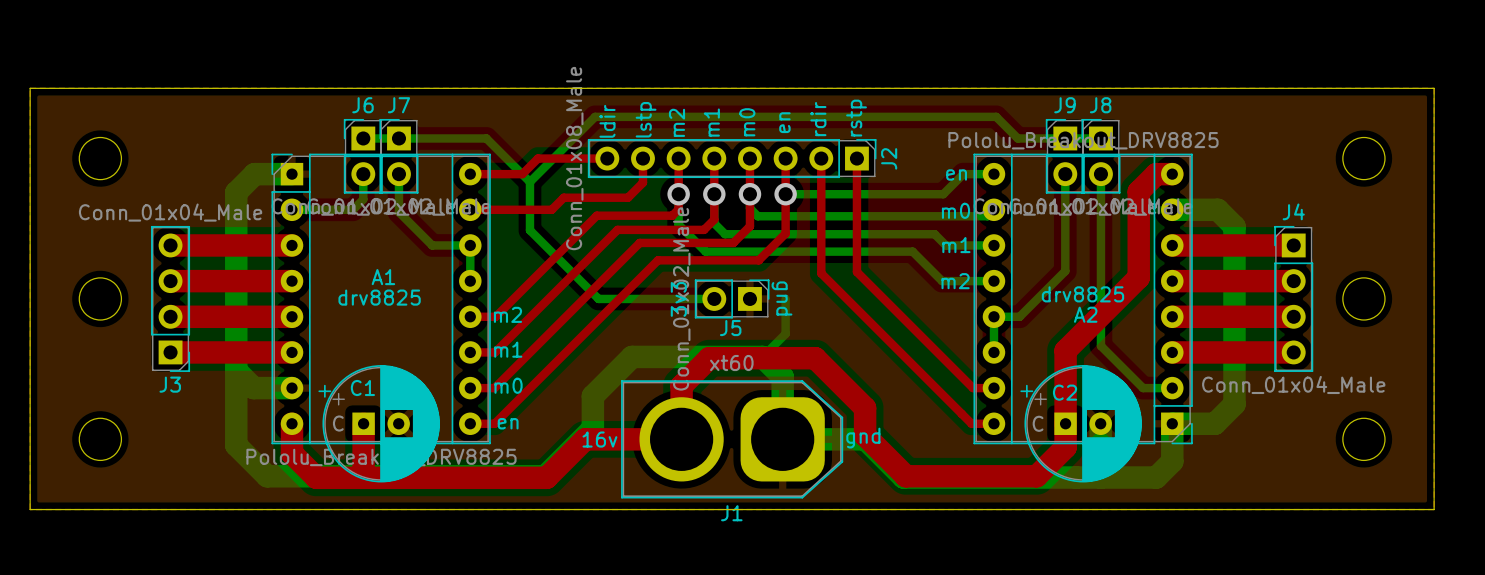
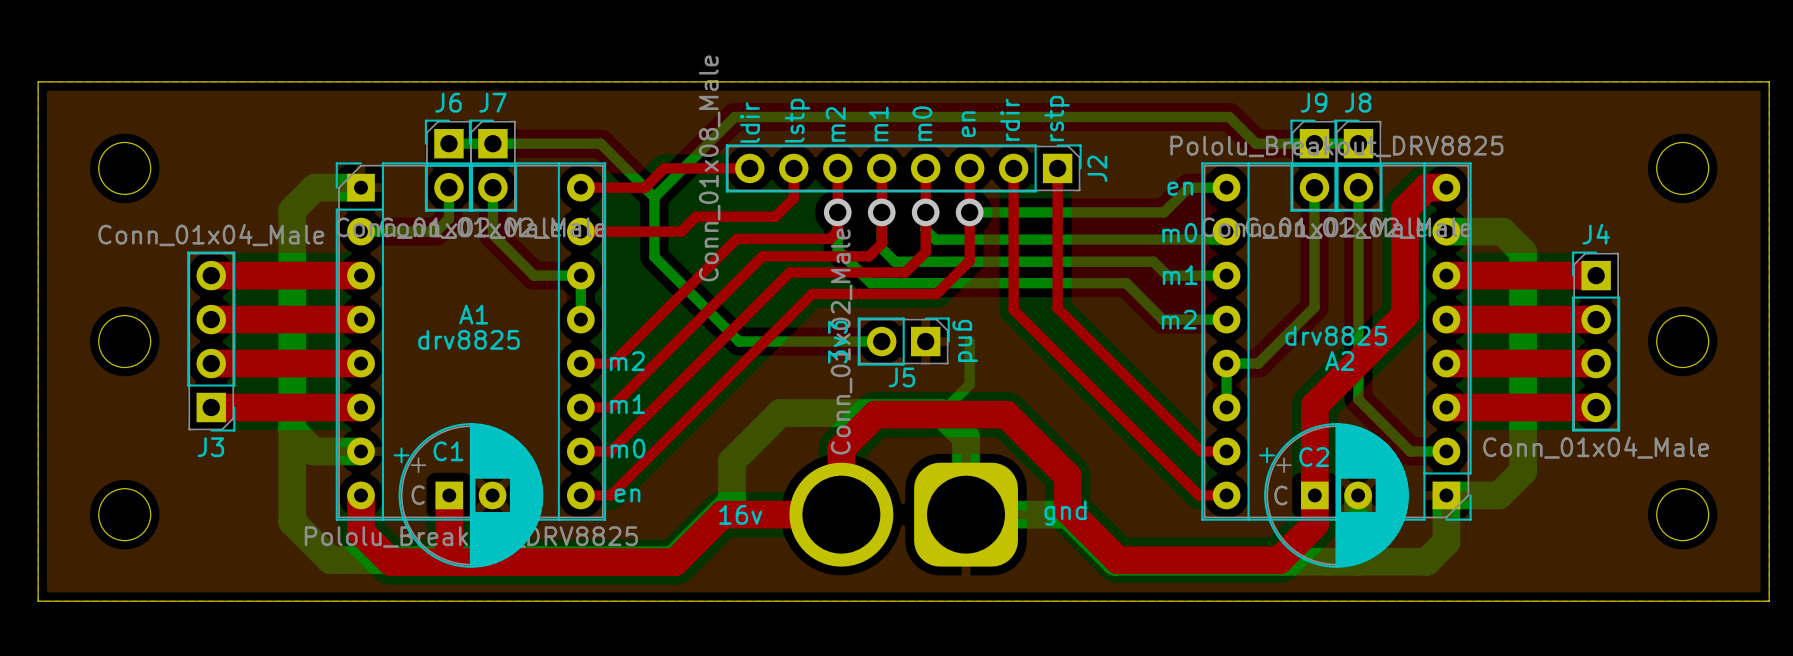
J1 side: top (732, 439) -> bottom (903, 514)

